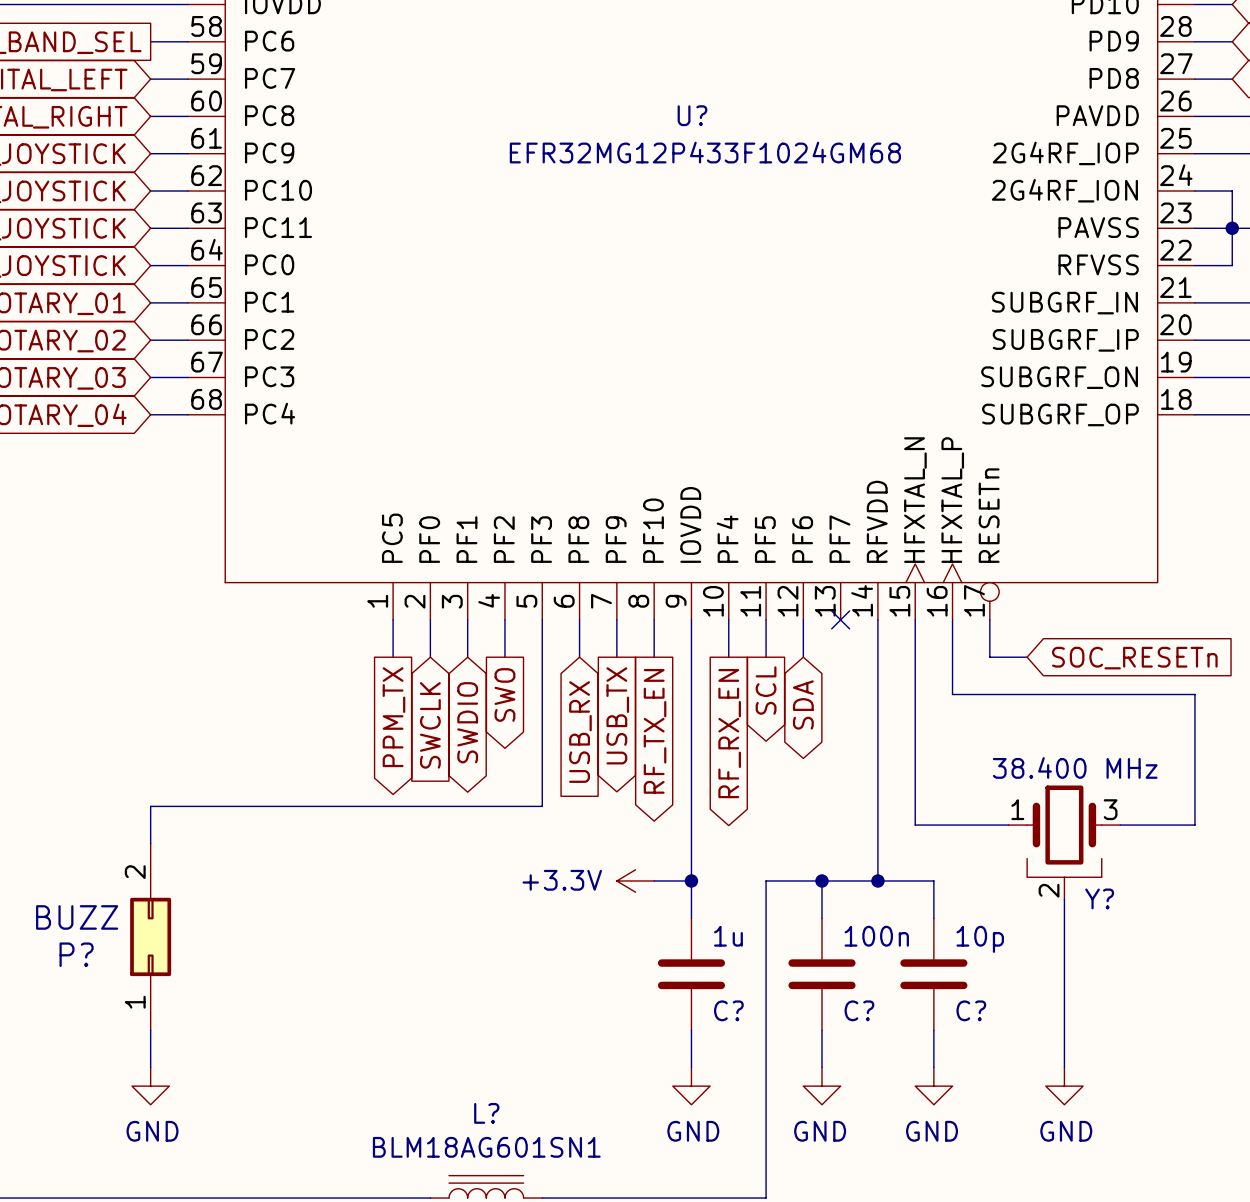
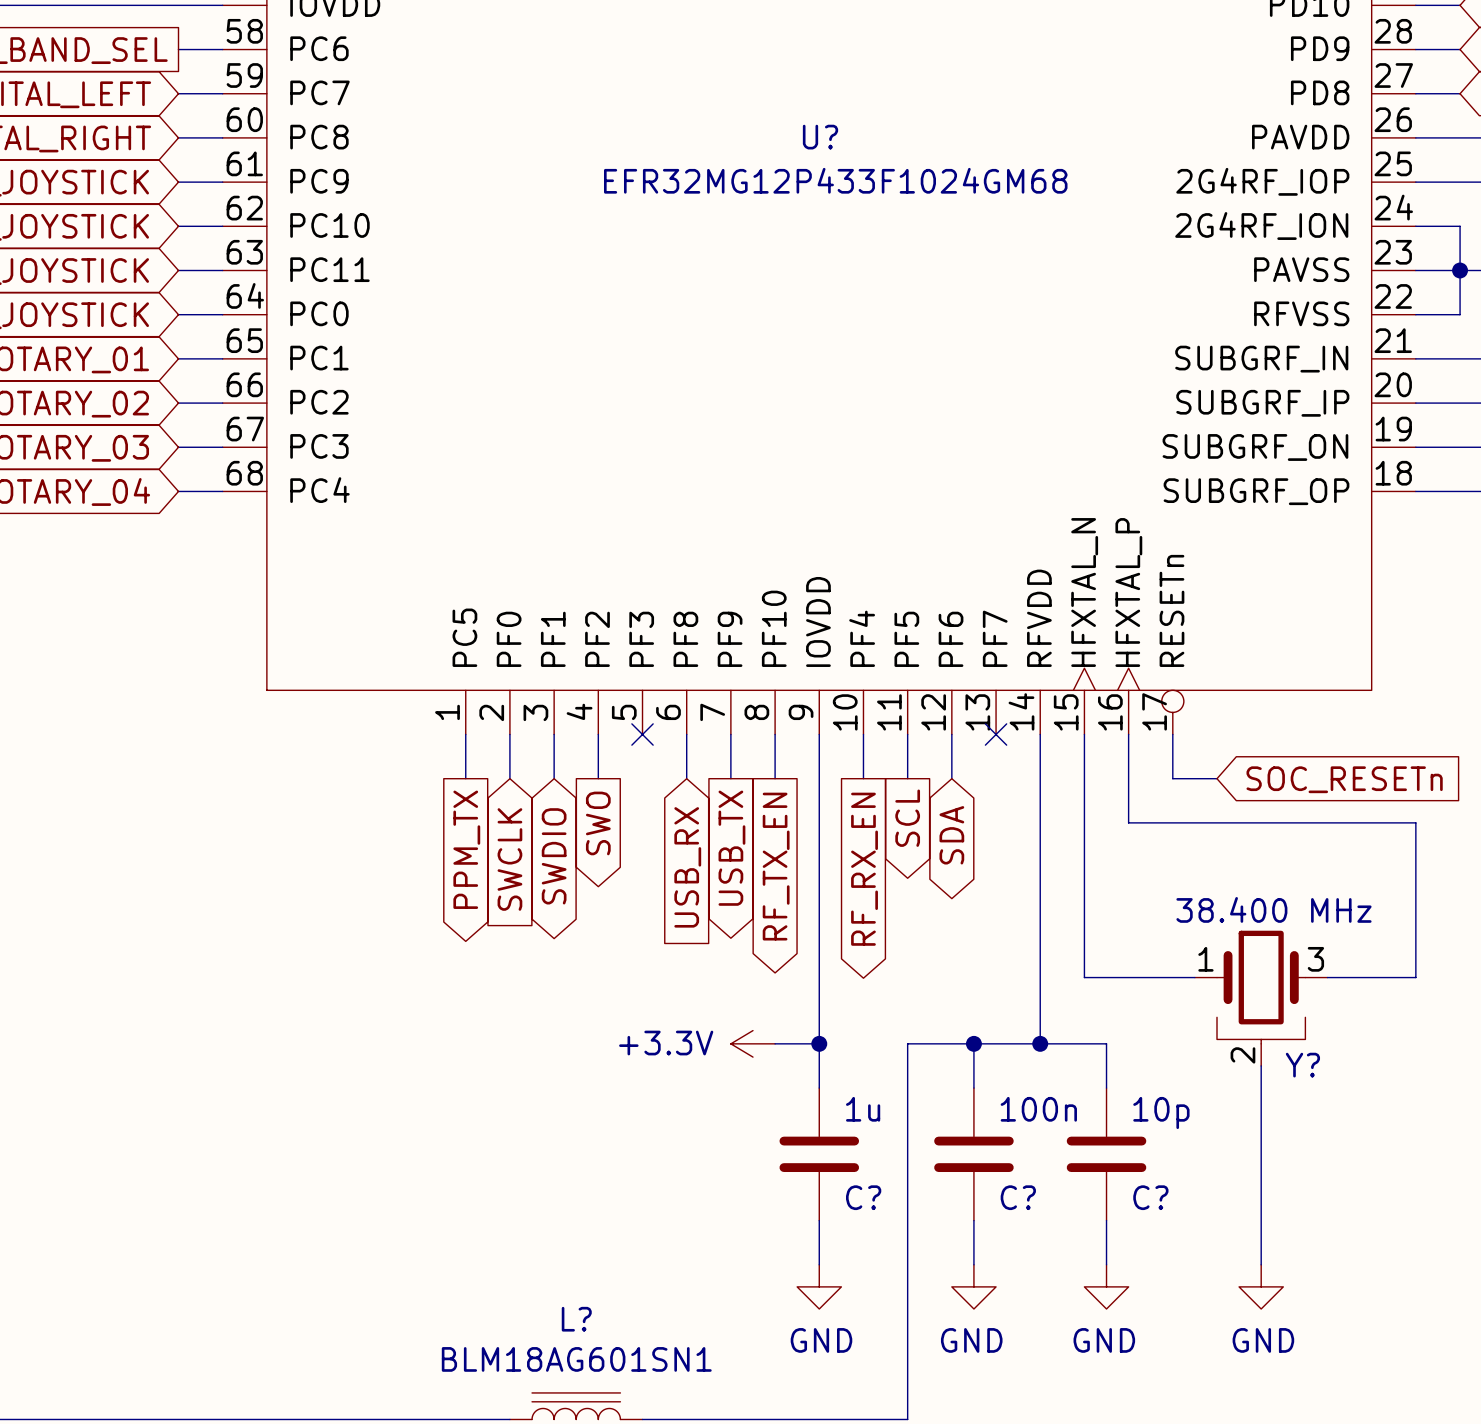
wire: (542, 619) (542, 806) (150, 806) (150, 843) -> none
no-connect mark: none -> (642, 734)
P?: BUZZ (150, 936) -> none
wire: (150, 1030) (150, 1067) -> none
power symbol: GND (150, 1086) -> none

